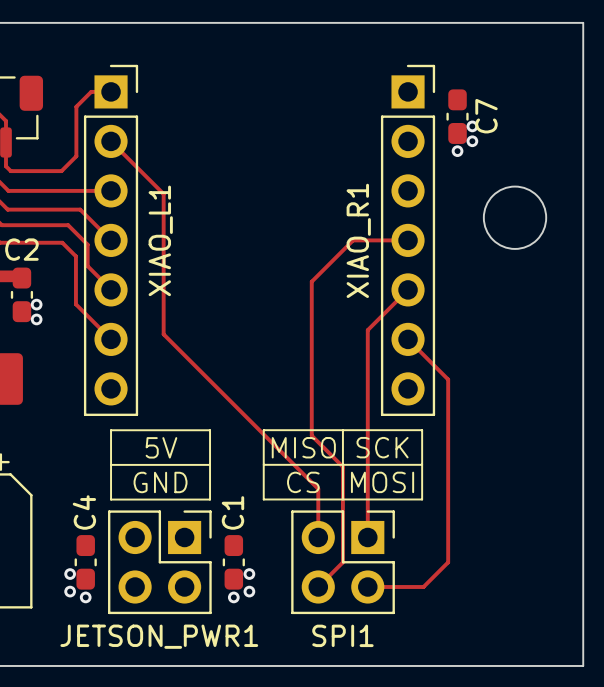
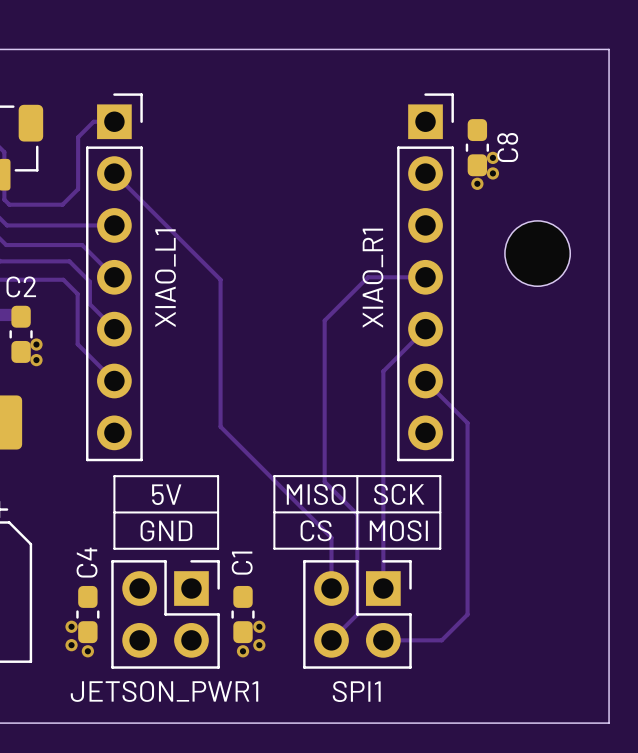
C7 name: C7 (486, 116) -> C8 (507, 147)
track: (163, 194) (163, 334) (212, 383) -> (169, 228) (220, 279) (220, 426)

